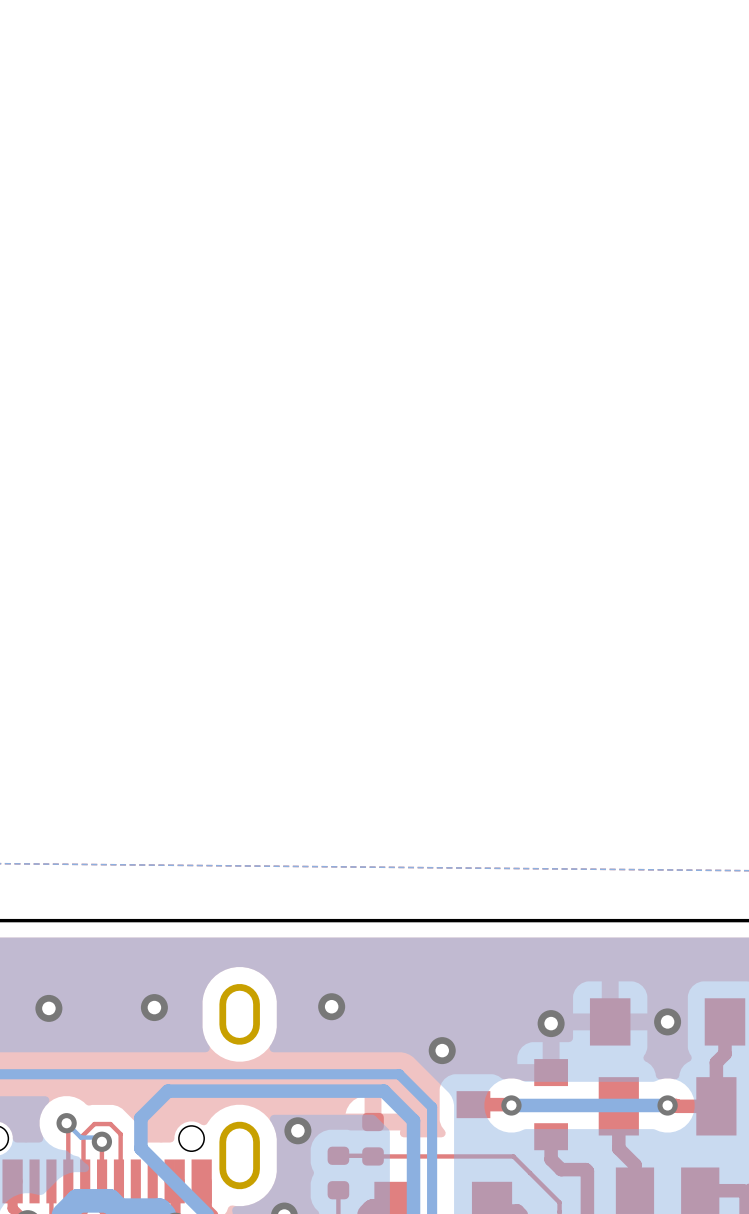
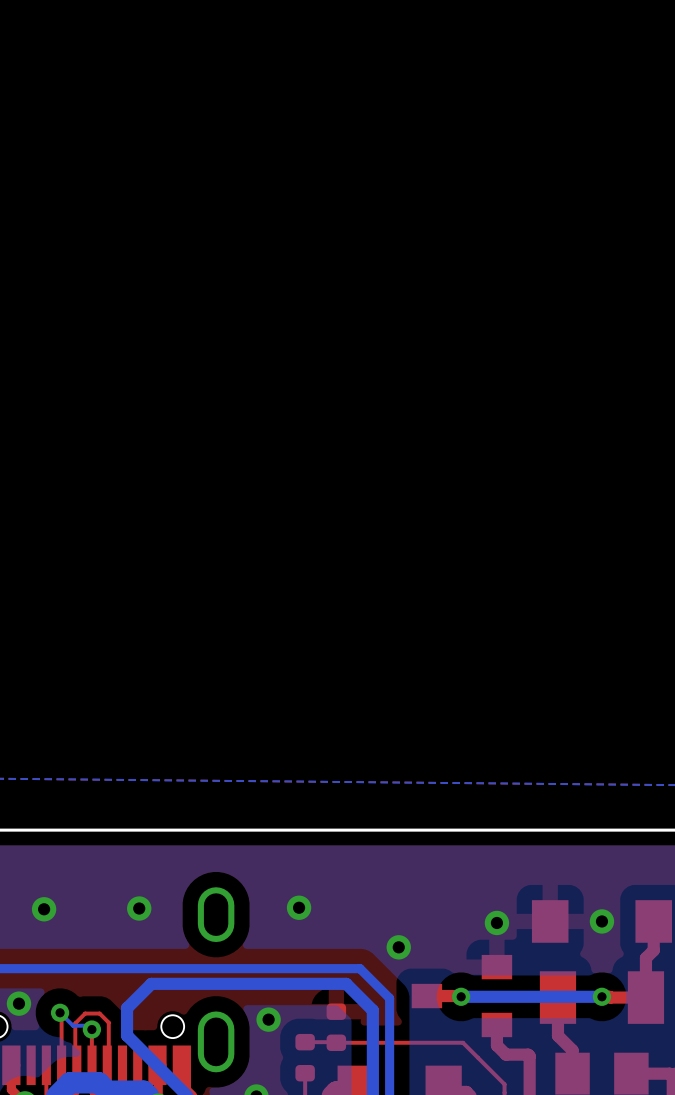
via: none -> (18, 1003)

